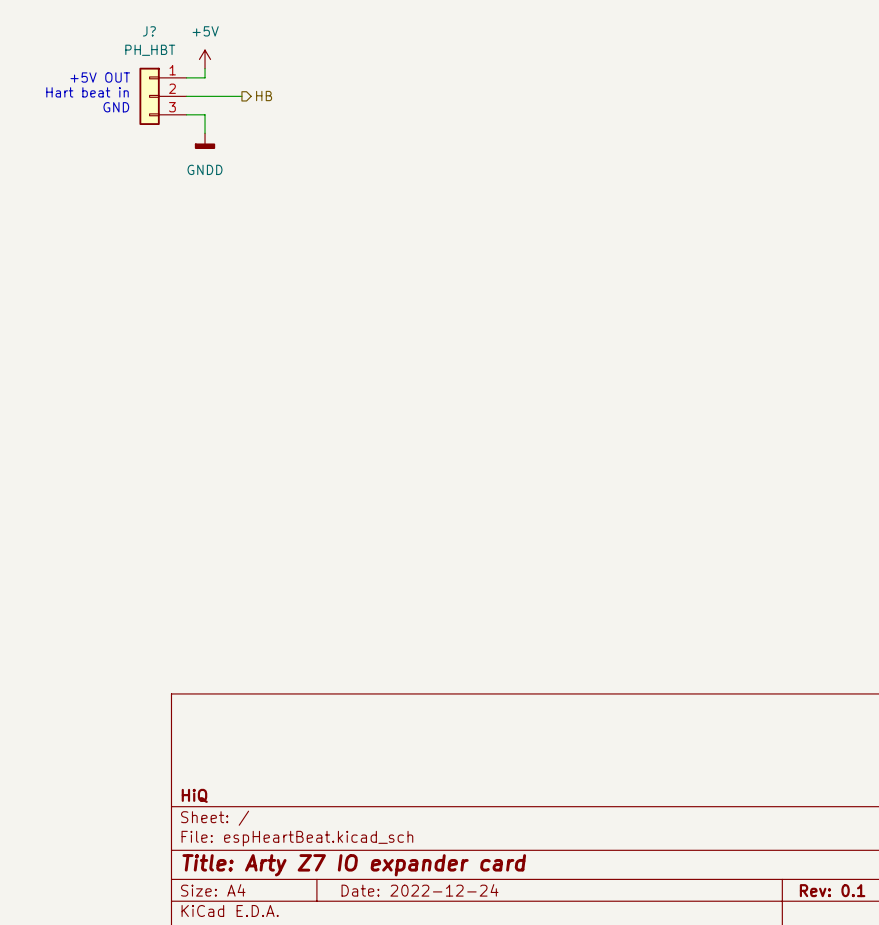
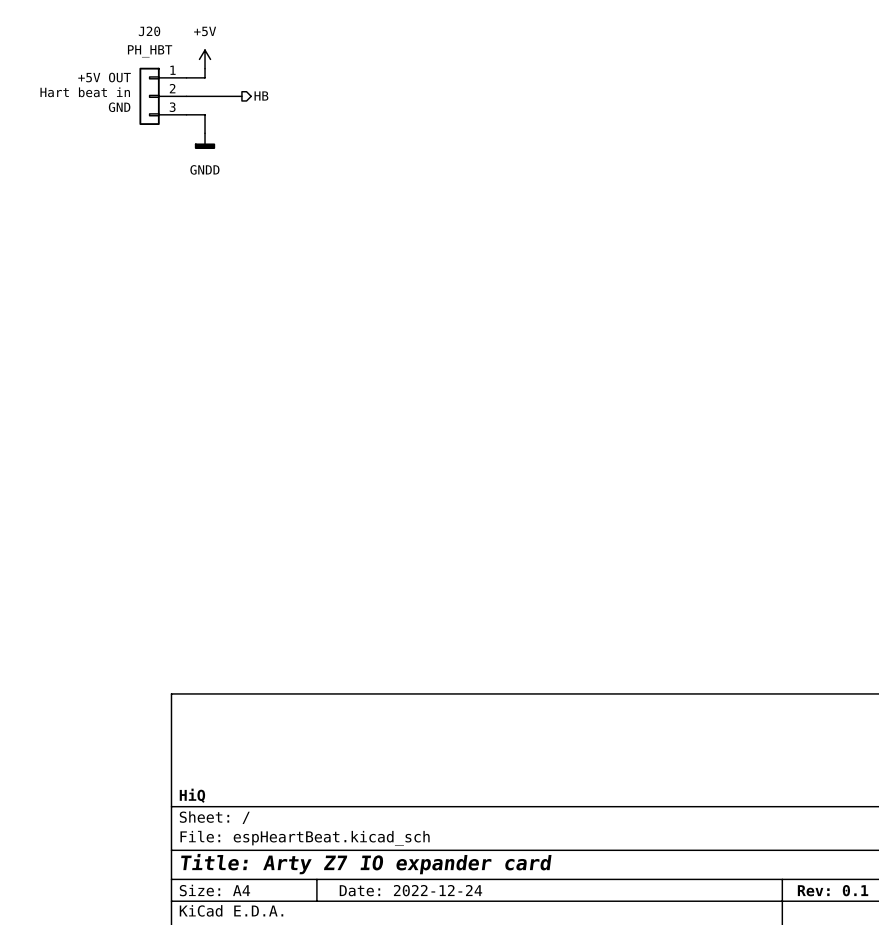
J? name: J? (149, 31) -> J20 (149, 31)

